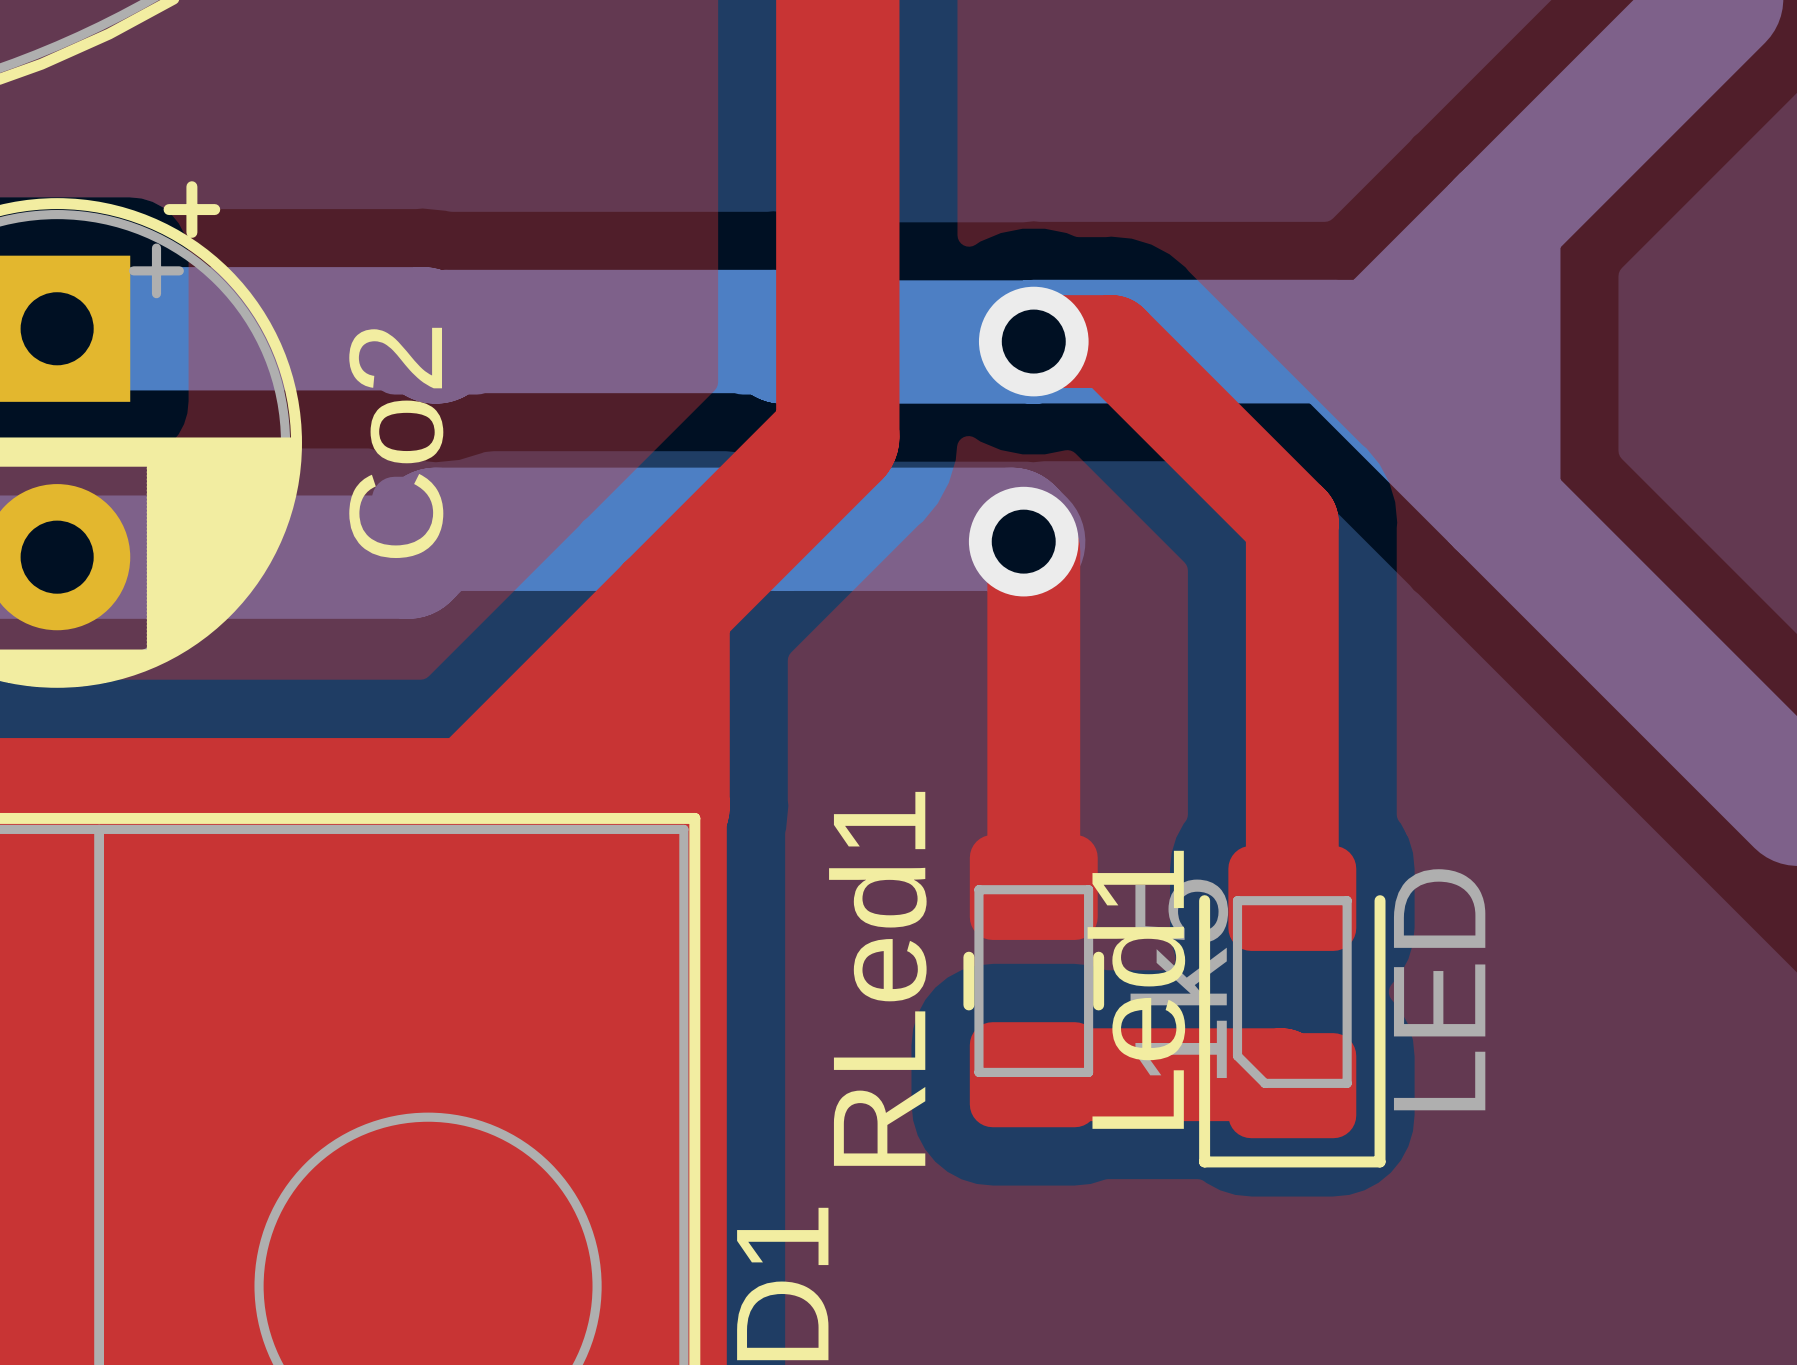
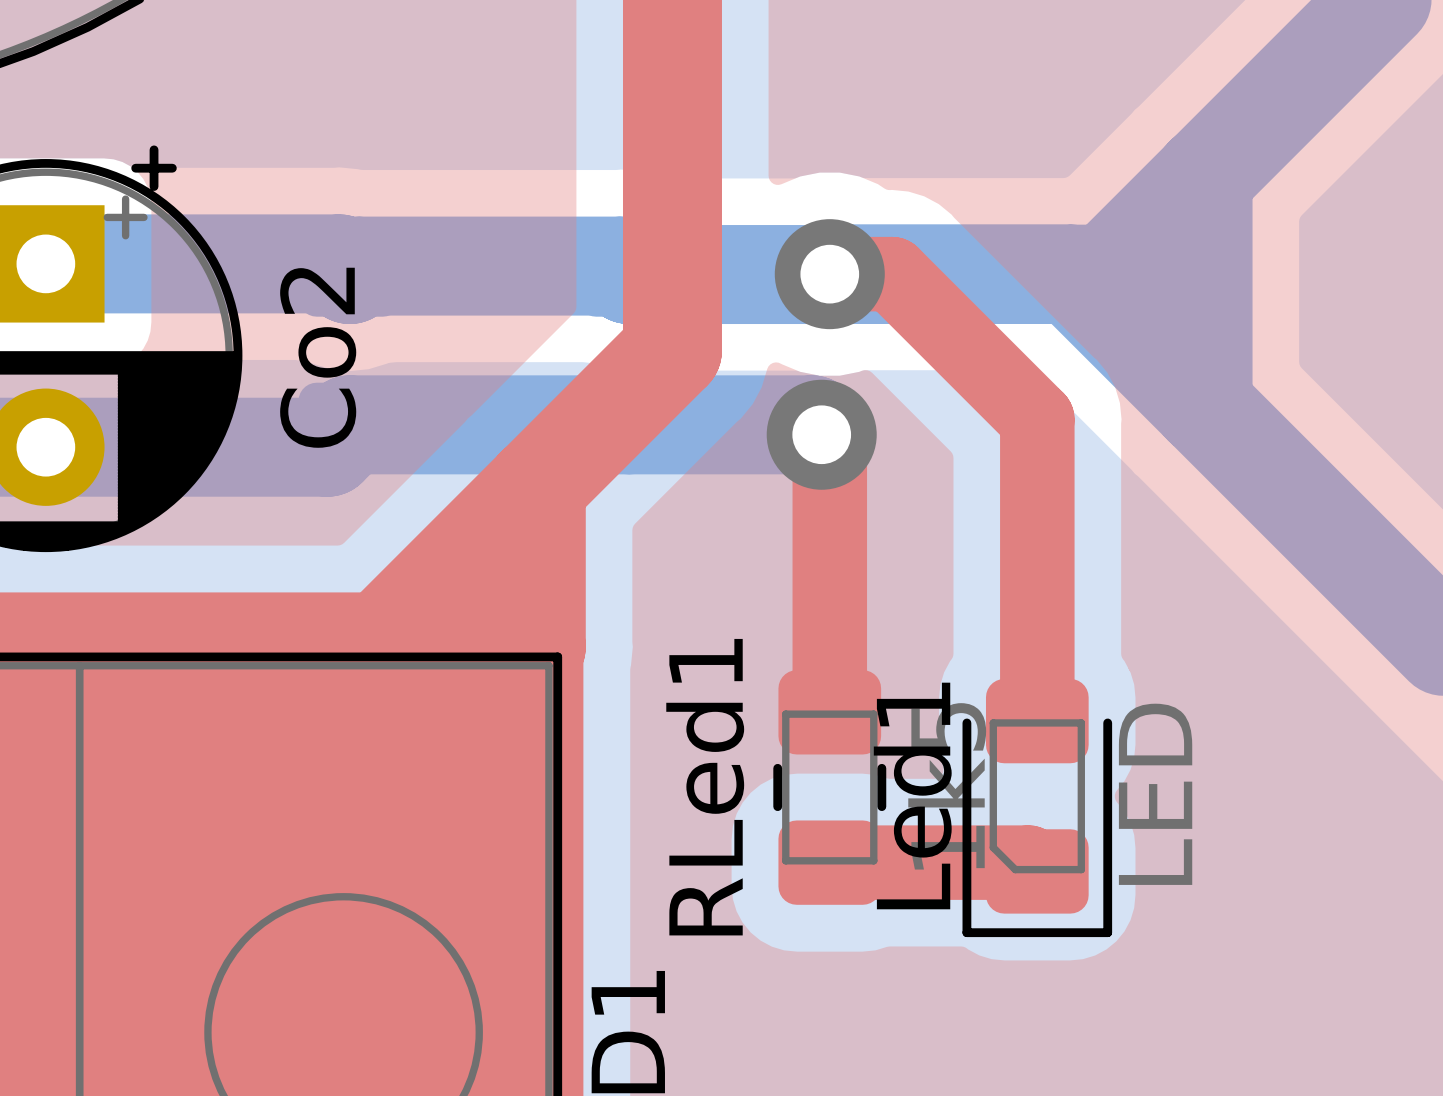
via size: [978, 286, 1089, 397] -> [774, 219, 885, 330]
via size: [968, 486, 1079, 597] -> [766, 379, 877, 490]

